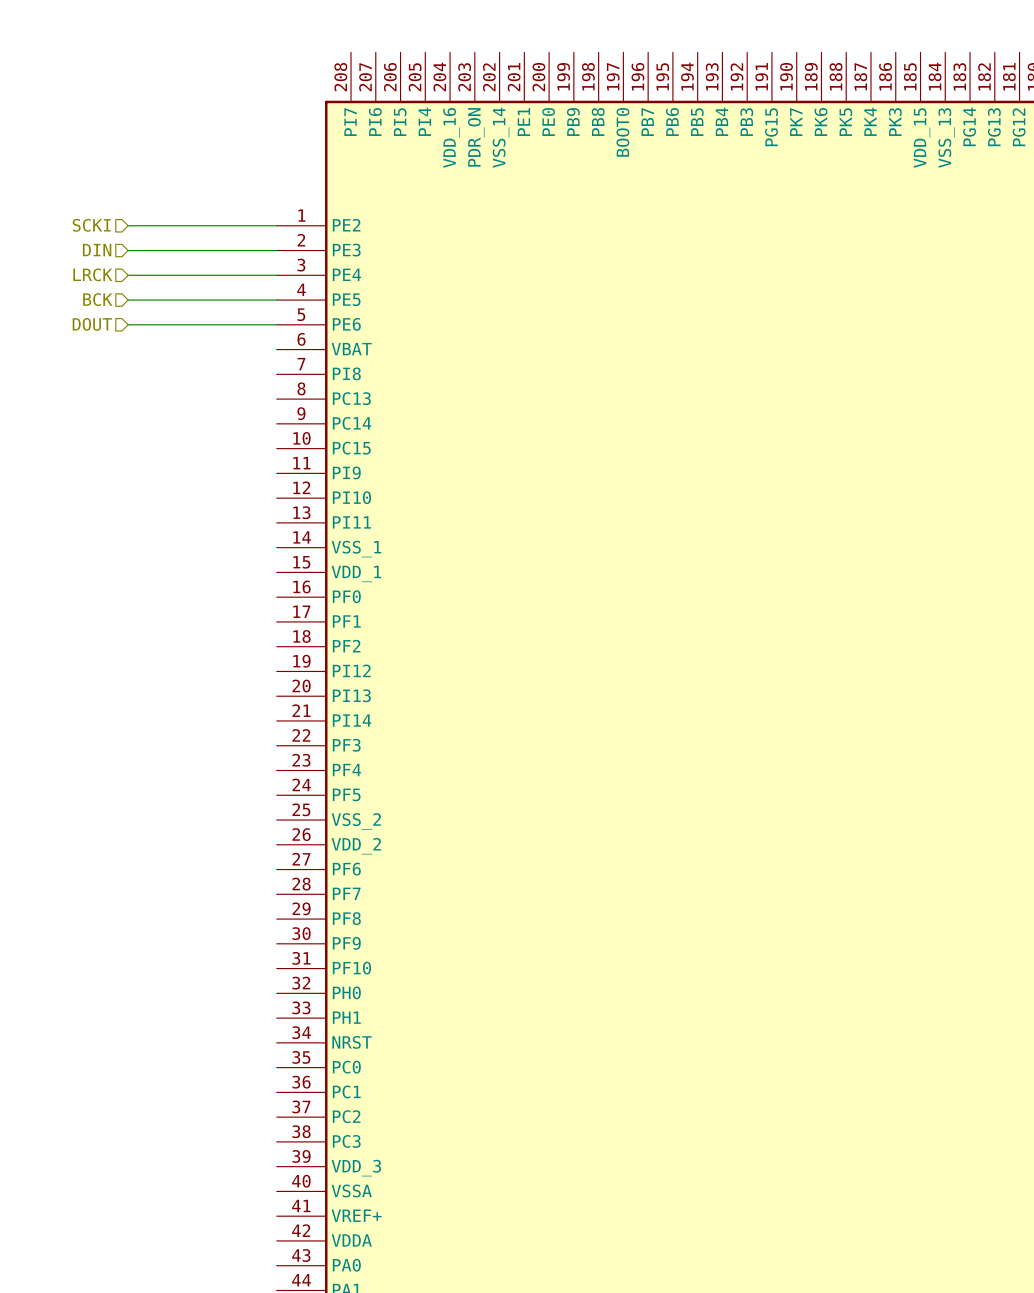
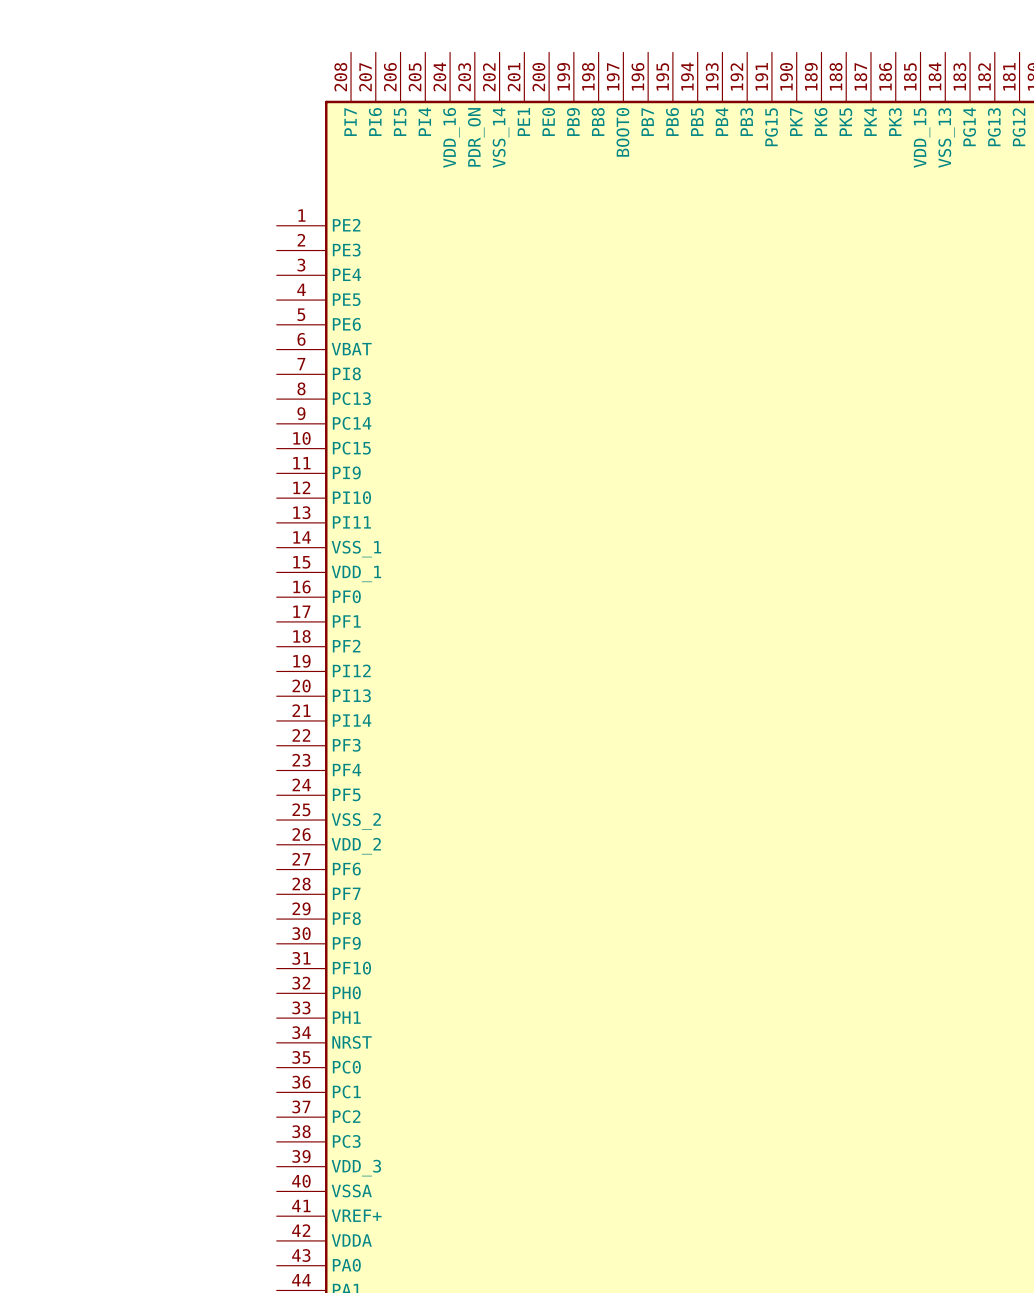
hierarchical label: SCKI (91, 225) -> none
wire: (128, 225) (276, 225) -> none
hierarchical label: DIN (97, 250) -> none
wire: (128, 250) (276, 250) -> none
hierarchical label: LRCK (92, 274) -> none
wire: (128, 275) (276, 275) -> none
hierarchical label: BCK (97, 299) -> none
wire: (128, 300) (276, 300) -> none
hierarchical label: DOUT (92, 324) -> none
wire: (128, 324) (276, 324) -> none

